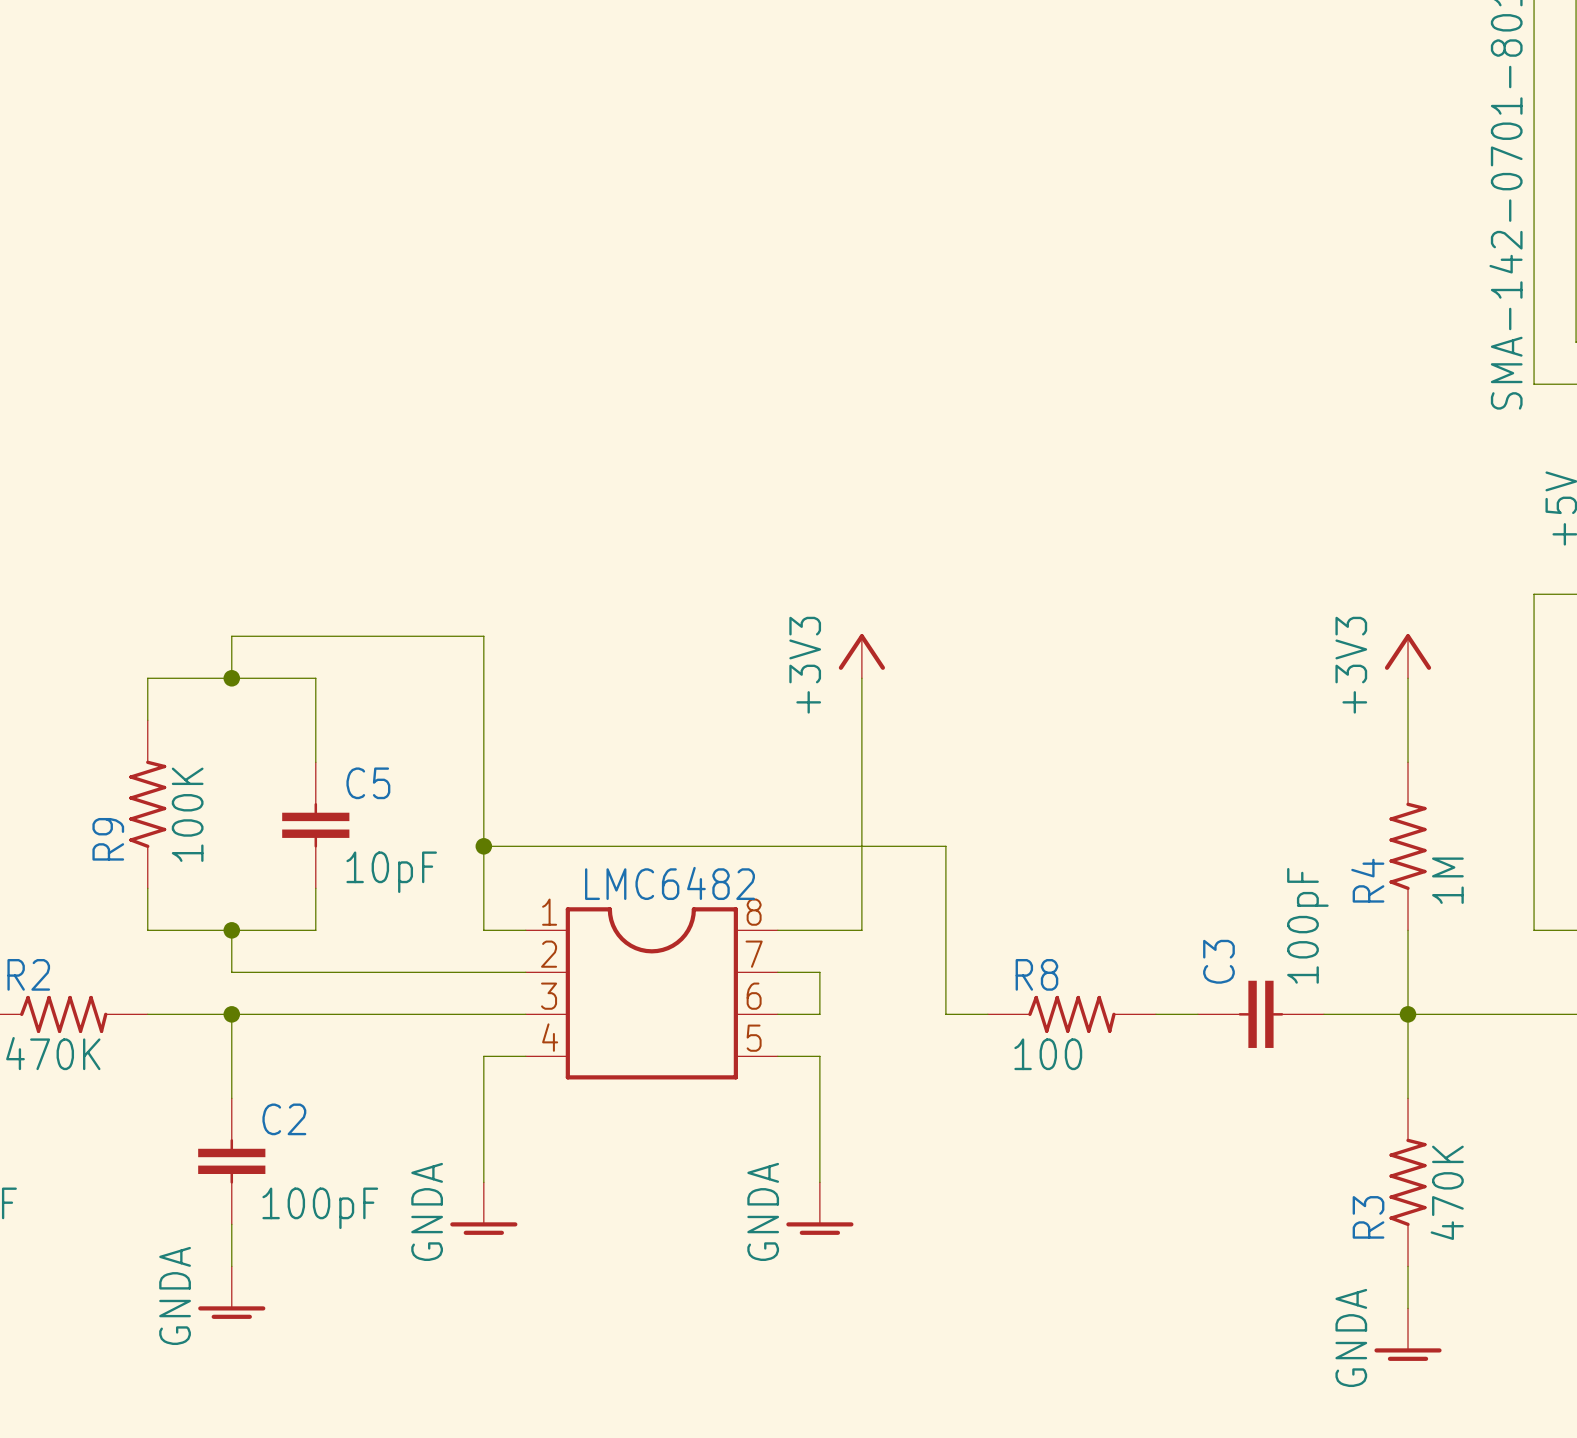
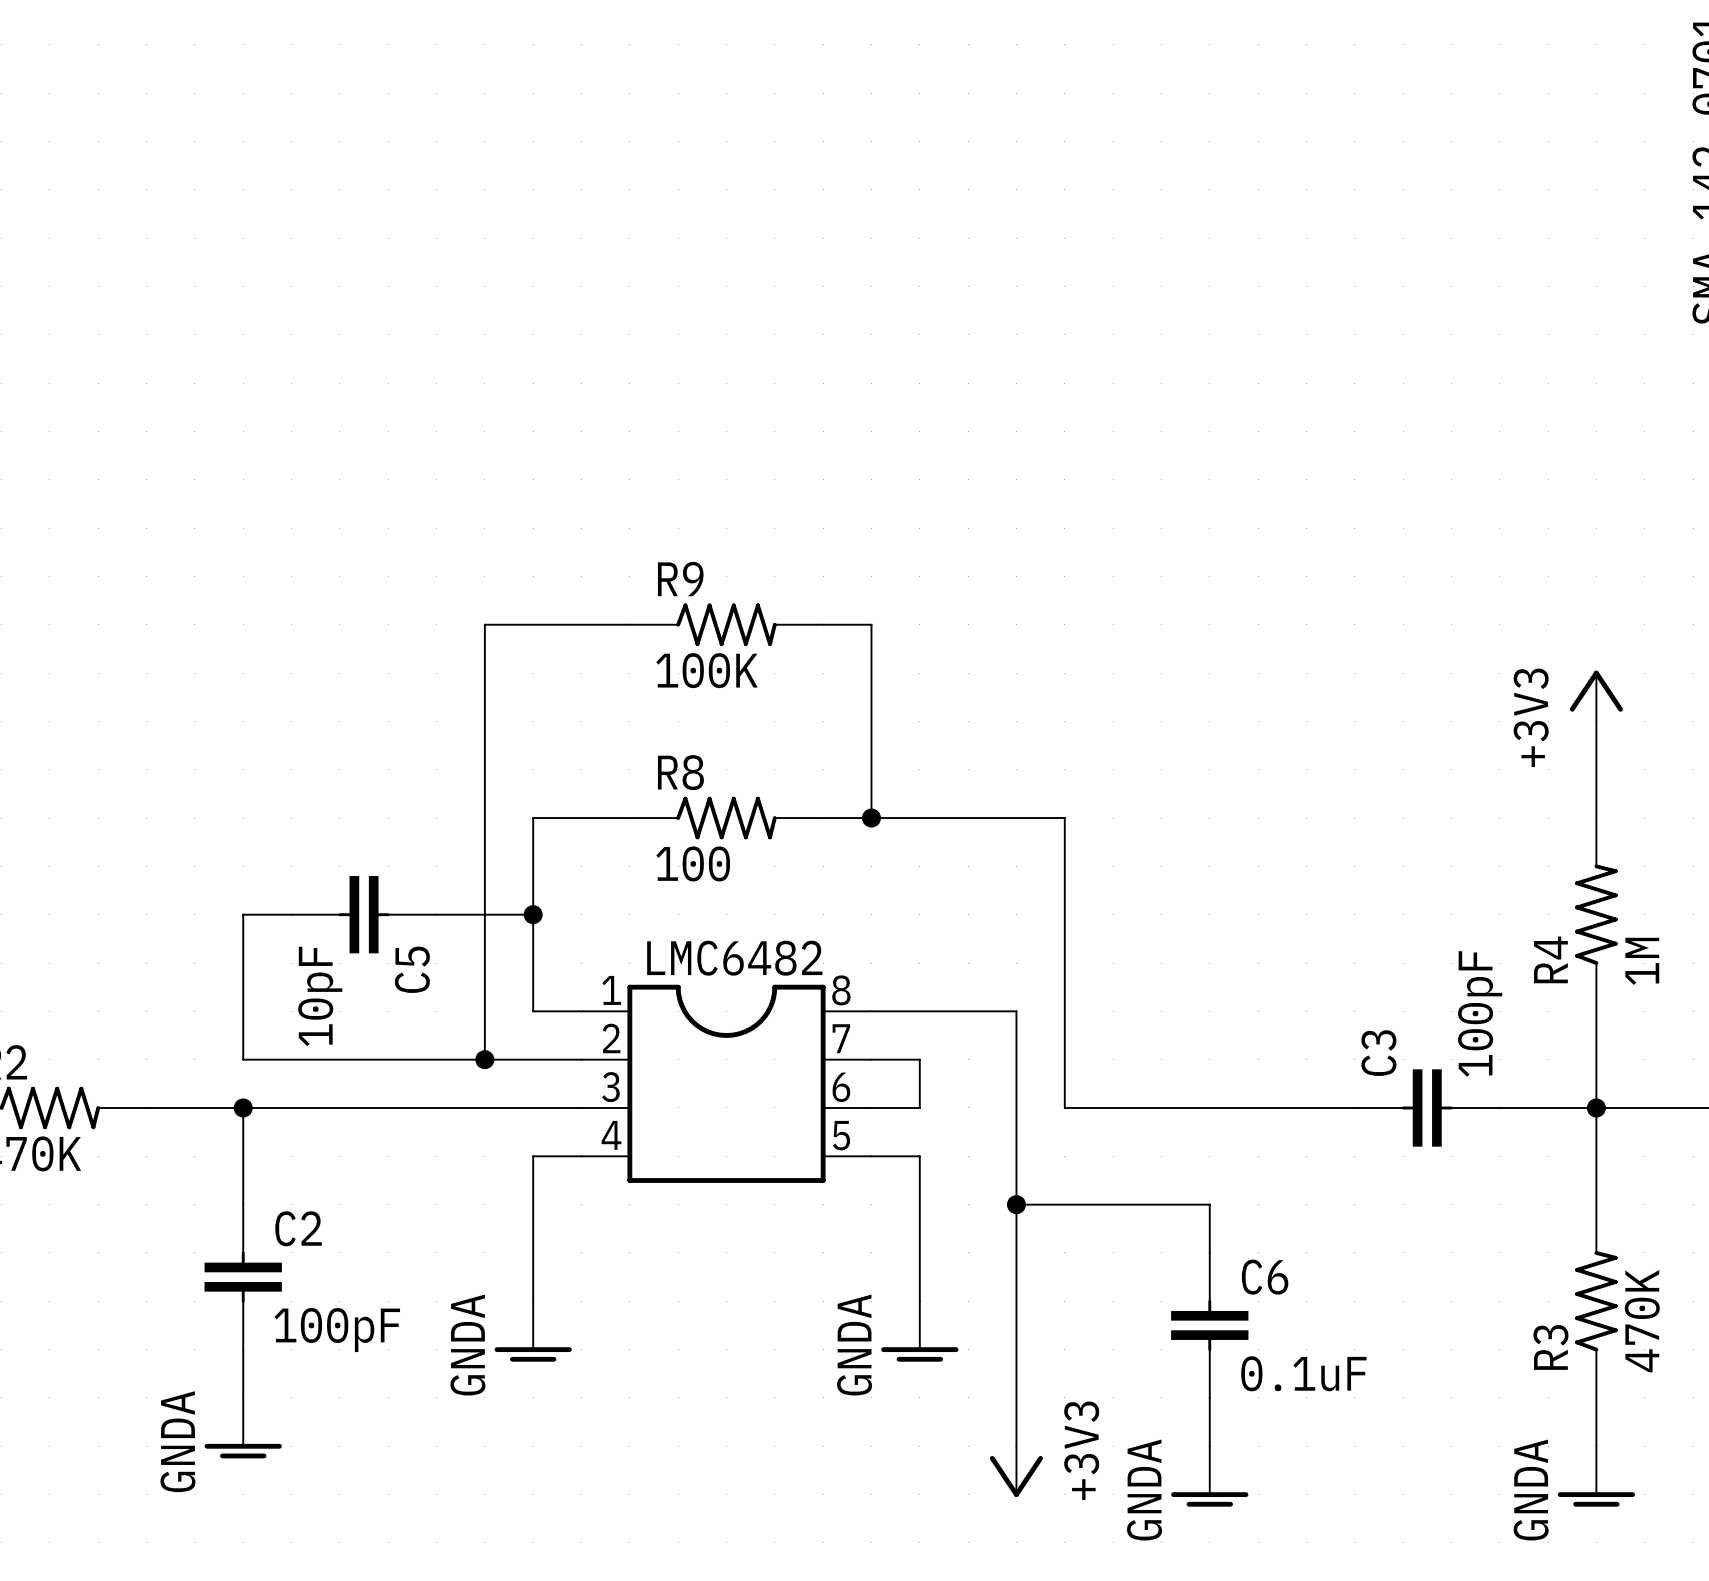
wire: none -> (629, 624) (484, 624) (484, 1059)
wire: none -> (823, 624) (871, 624) (871, 818)
power symbol: +3V3 (861, 656) -> none
wire: (231, 678) (231, 636) (483, 636) (483, 762) -> (629, 818) (533, 818)
junction: (231, 678) -> none
wire: (861, 678) (861, 930) -> (1016, 1446) (1016, 1011) (968, 1011)
wire: (147, 720) (147, 678) (315, 678) (315, 762) -> none
junction: none -> (871, 818)
R9 rotation: 0° (147, 804) -> 90° clockwise (726, 624)
R9 position: (147, 804) -> (726, 624)
C5 rotation: 0° (315, 825) -> 90° clockwise (364, 914)
wire: none -> (291, 914) (243, 914) (243, 1011)
wire: none -> (436, 914) (533, 914)
wire: (483, 846) (945, 846) -> (823, 818) (1064, 818) (1064, 914)
wire: (147, 888) (147, 930) (315, 930) (315, 888) -> none
junction: (231, 930) -> none
junction: none -> (484, 1059)
R8 position: (1071, 1014) -> (726, 818)
wire: none -> (1016, 1204) (1209, 1204) (1209, 1252)
junction: none -> (1016, 1204)
C6: none -> 0.1uF (1209, 1325)
wire: none -> (1209, 1397) (1209, 1446)
power symbol: none -> +3V3 (1016, 1471)
power symbol: none -> GNDA (1209, 1476)

